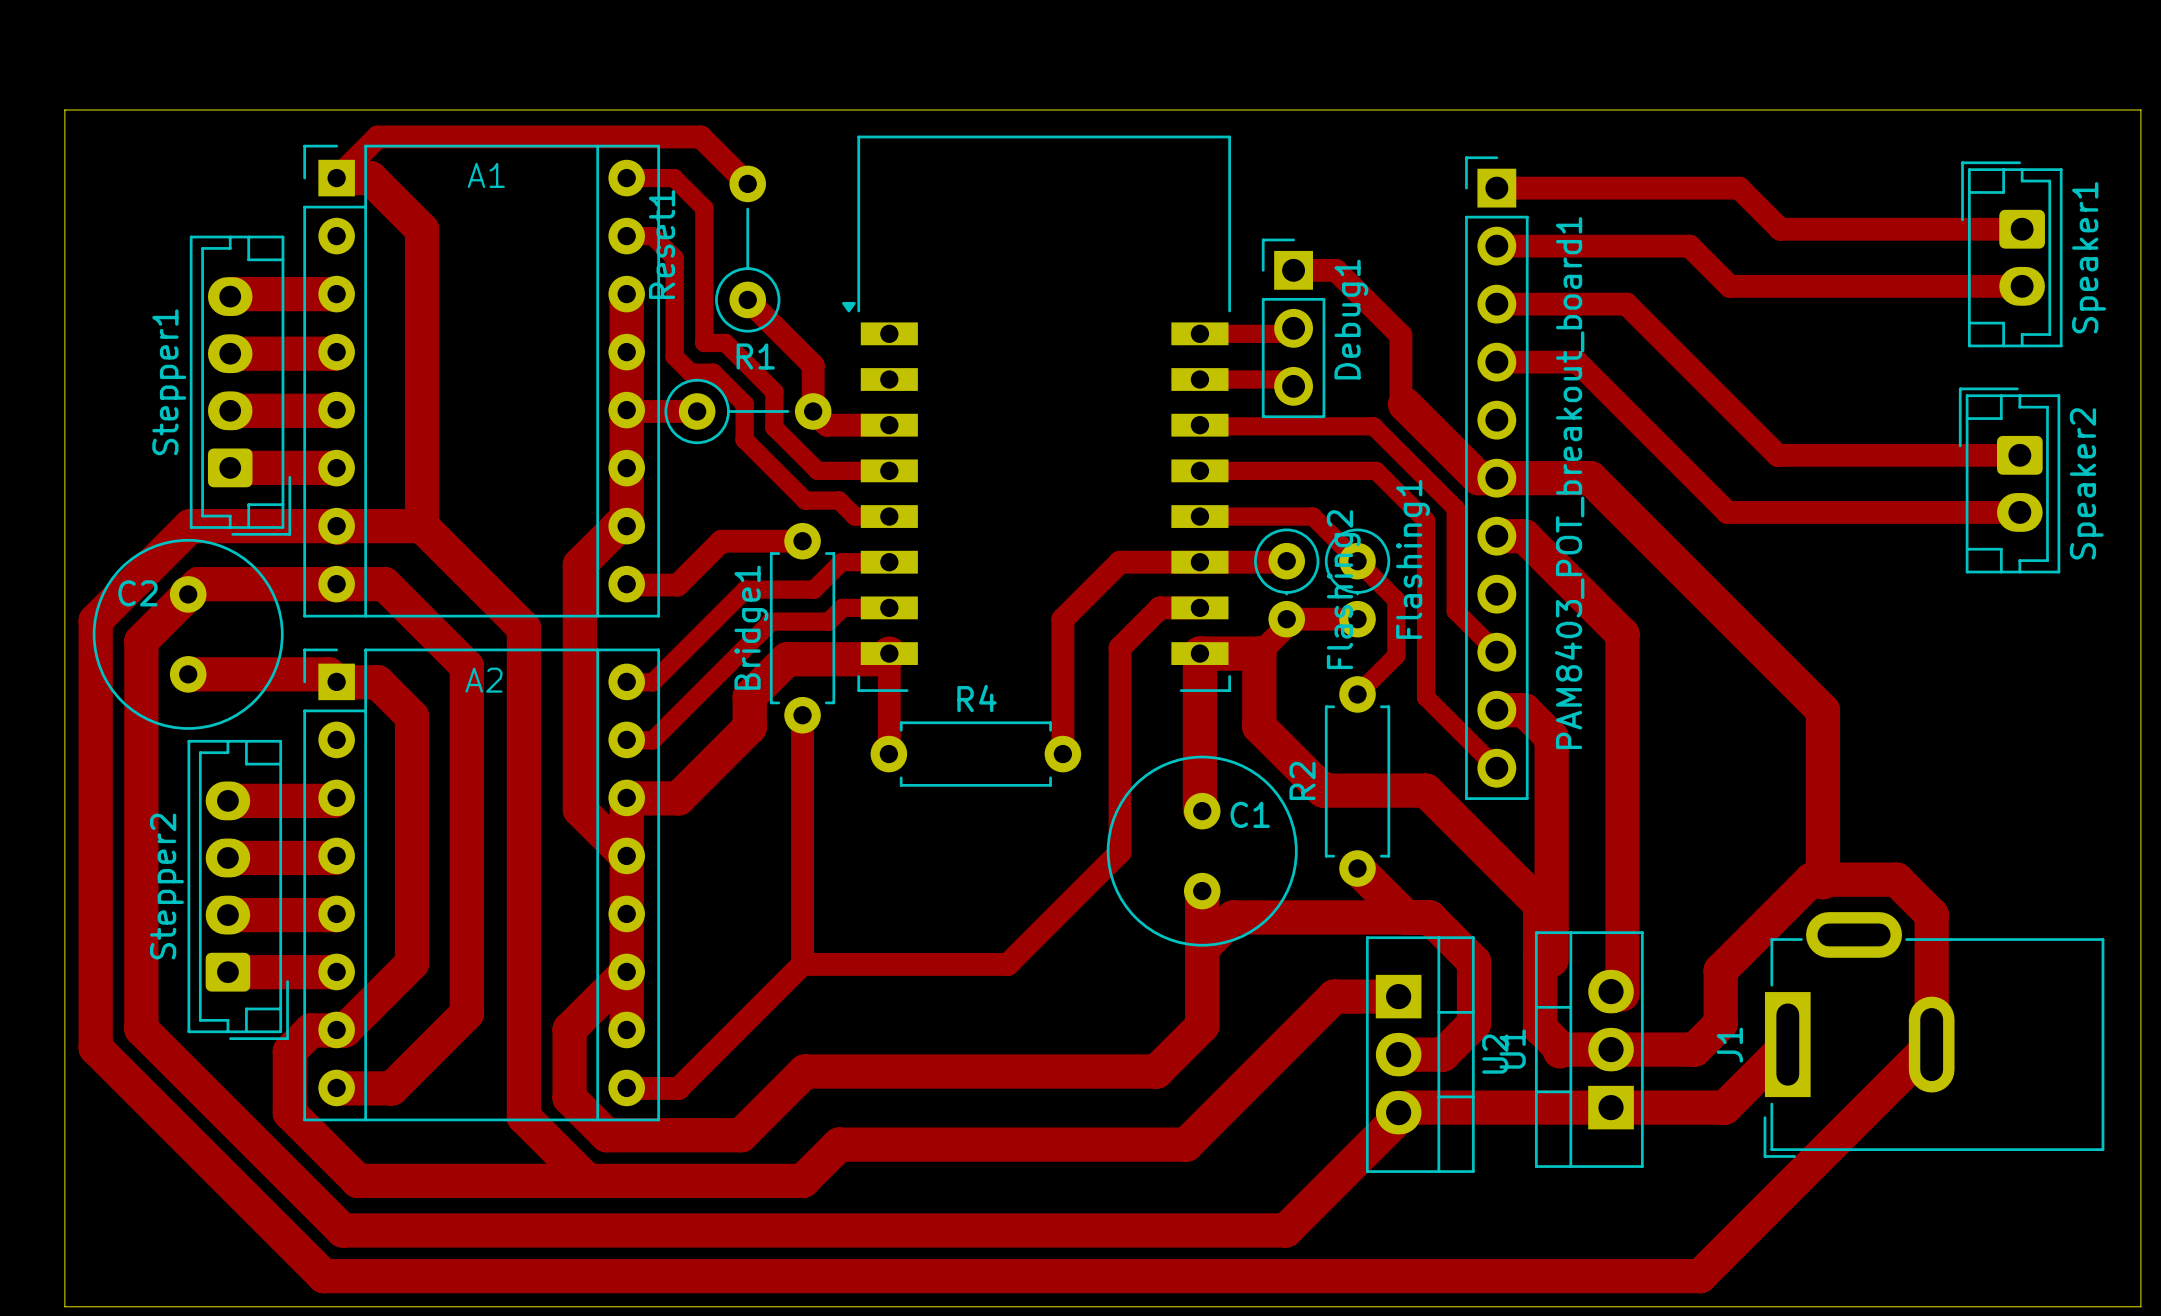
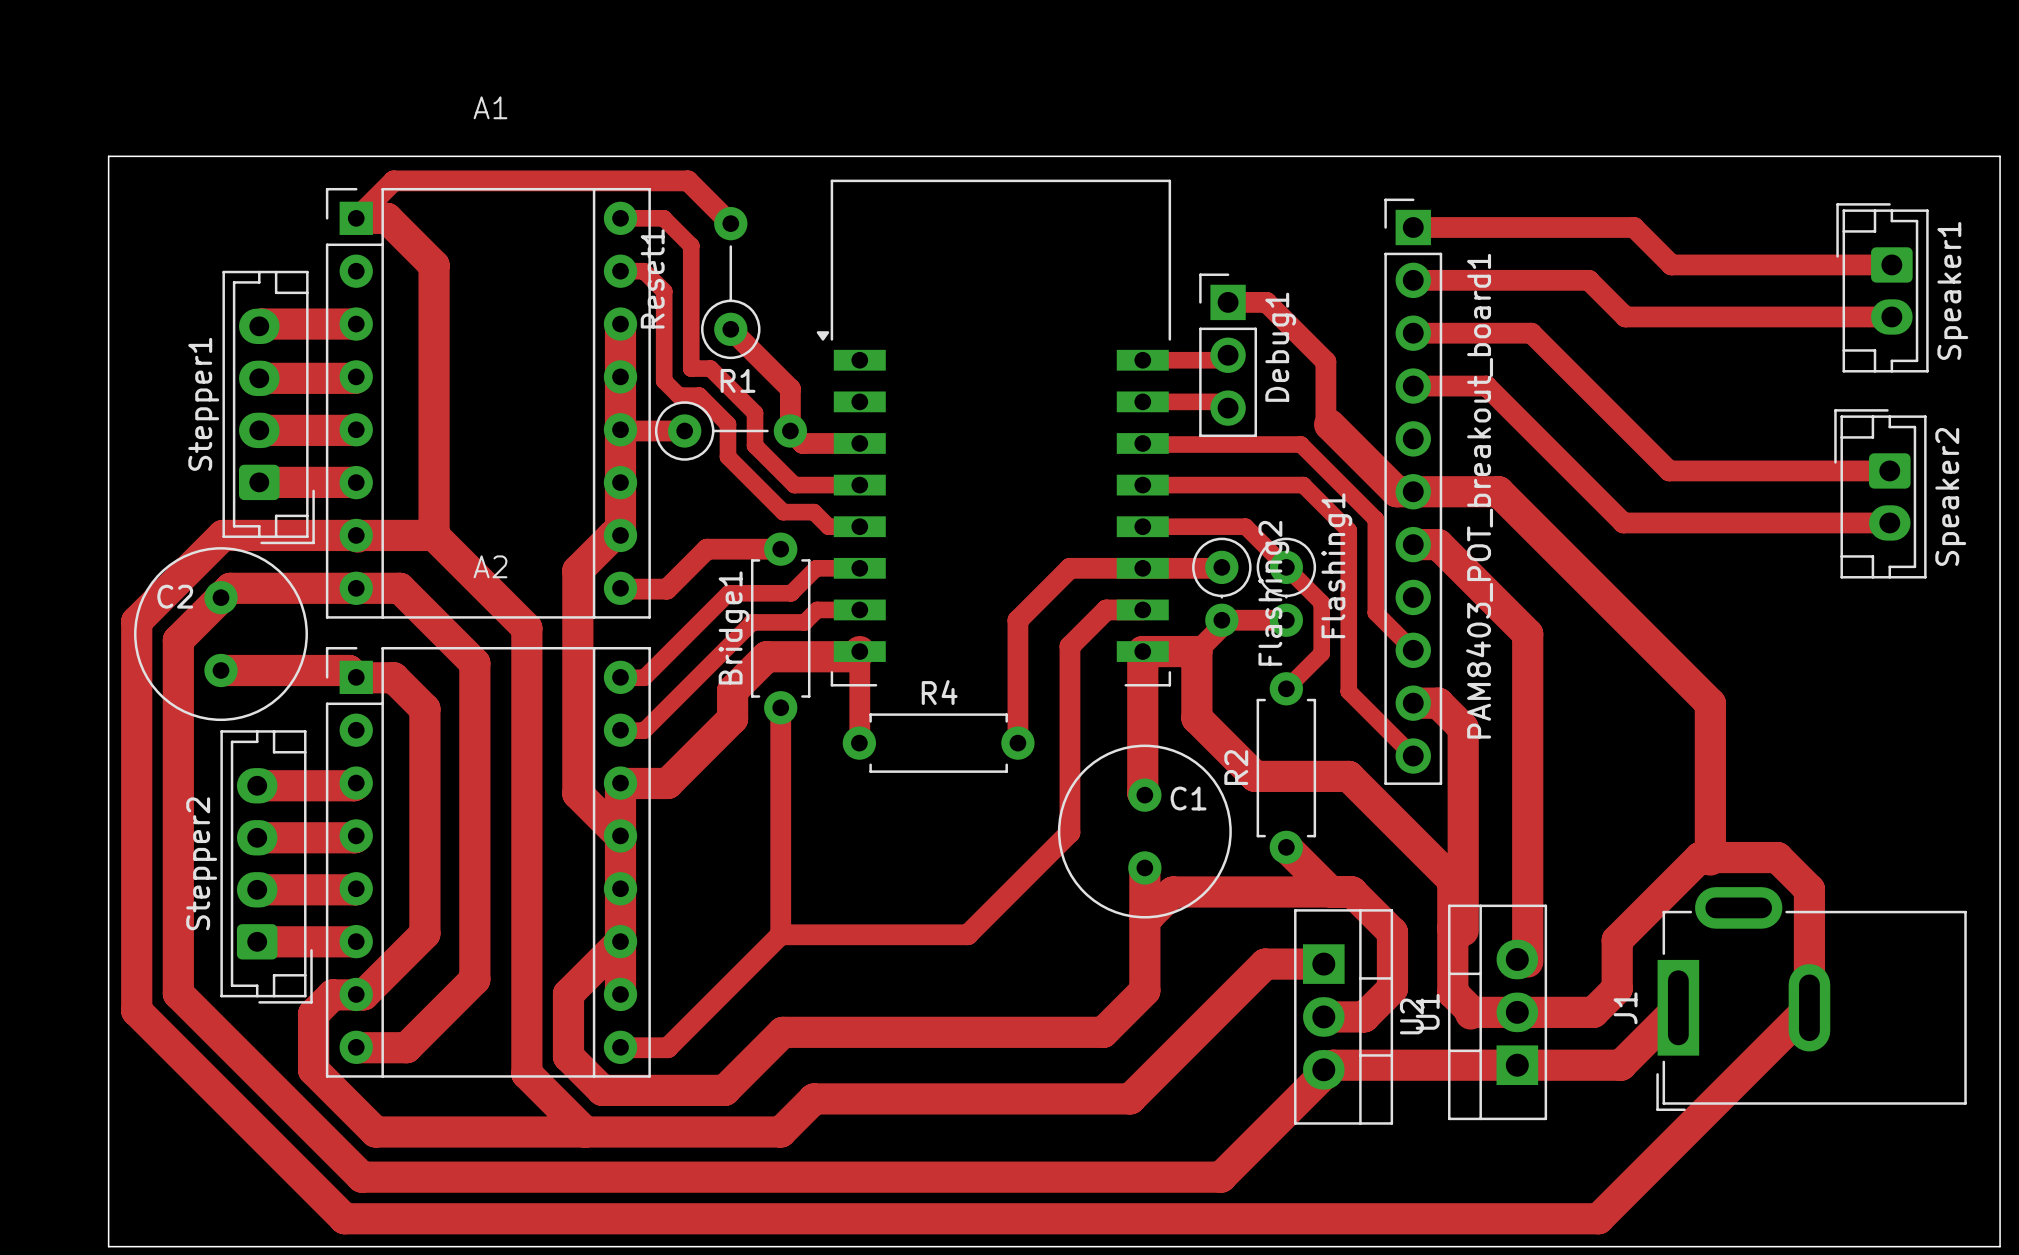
A1 name position: A1 (486, 175) -> A1 (490, 107)
A2 name position: A2 (484, 680) -> A2 (490, 566)

